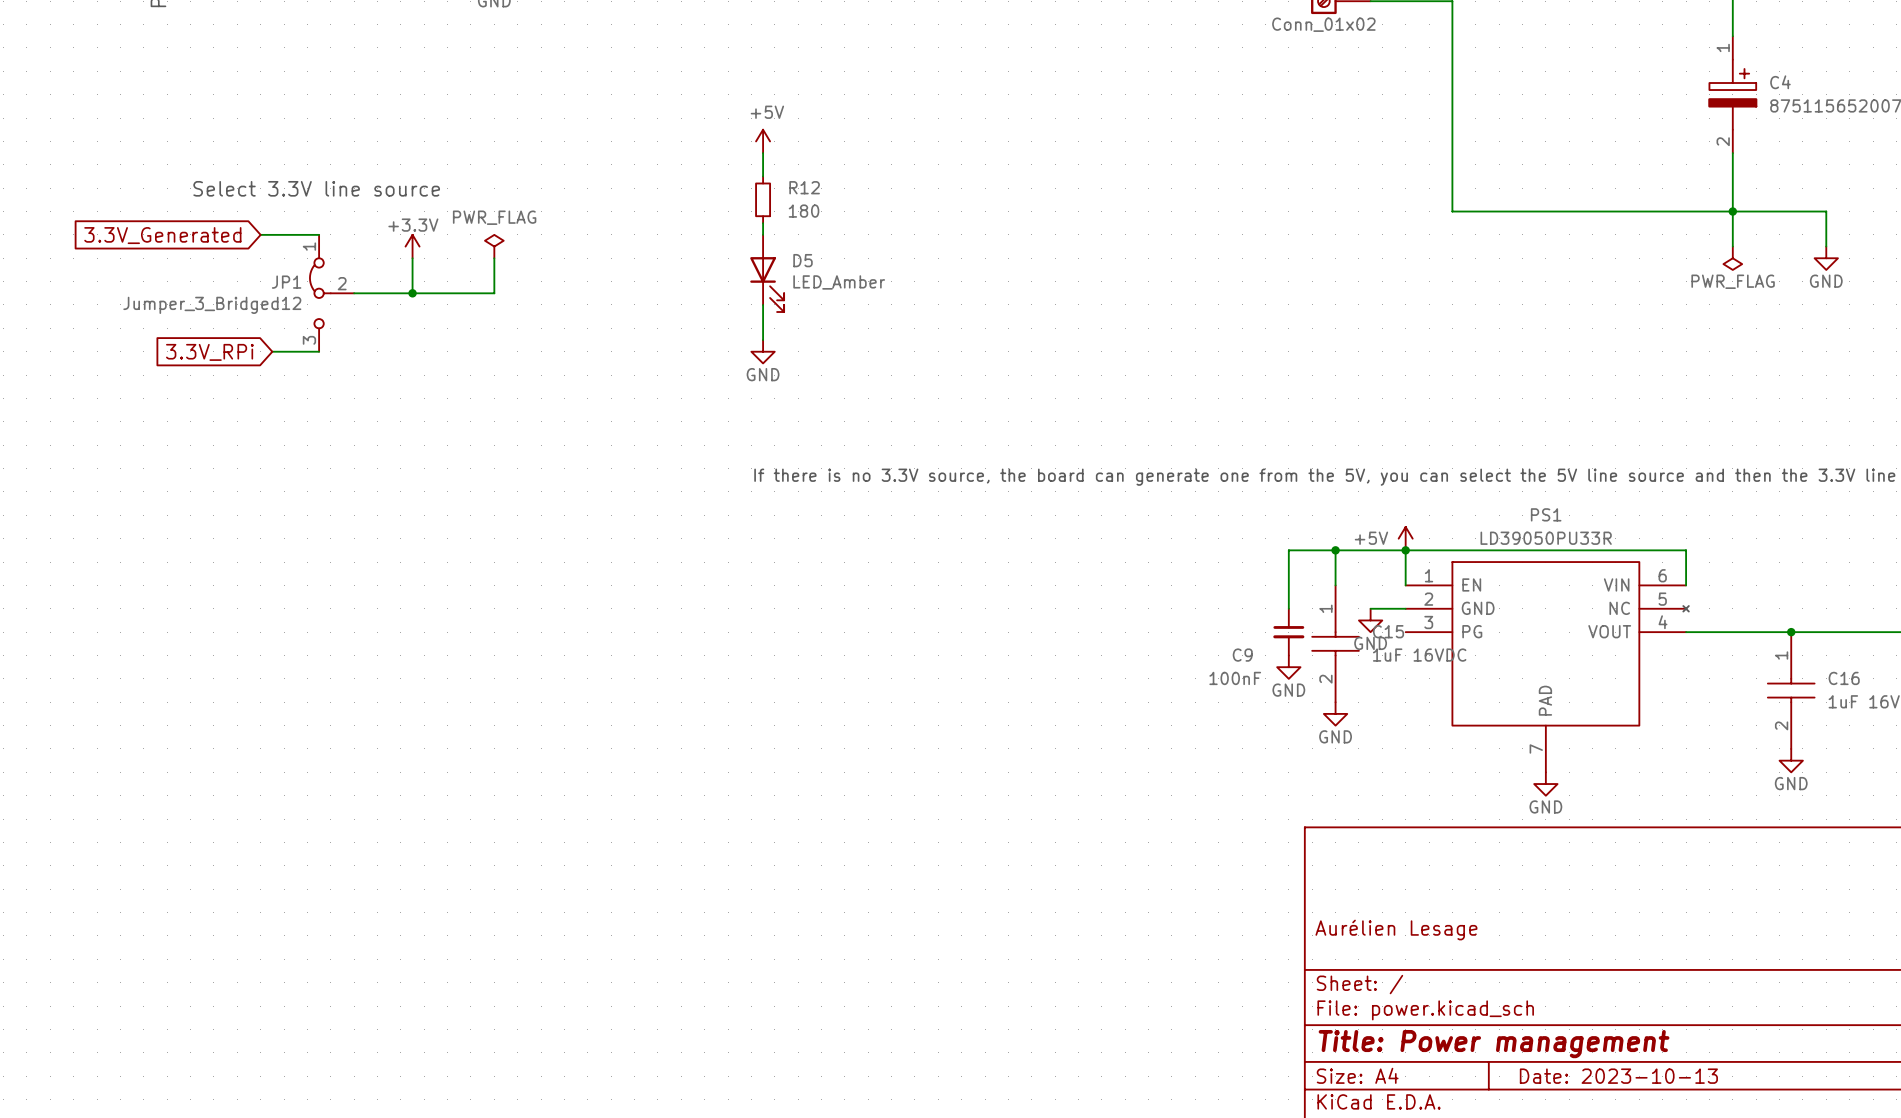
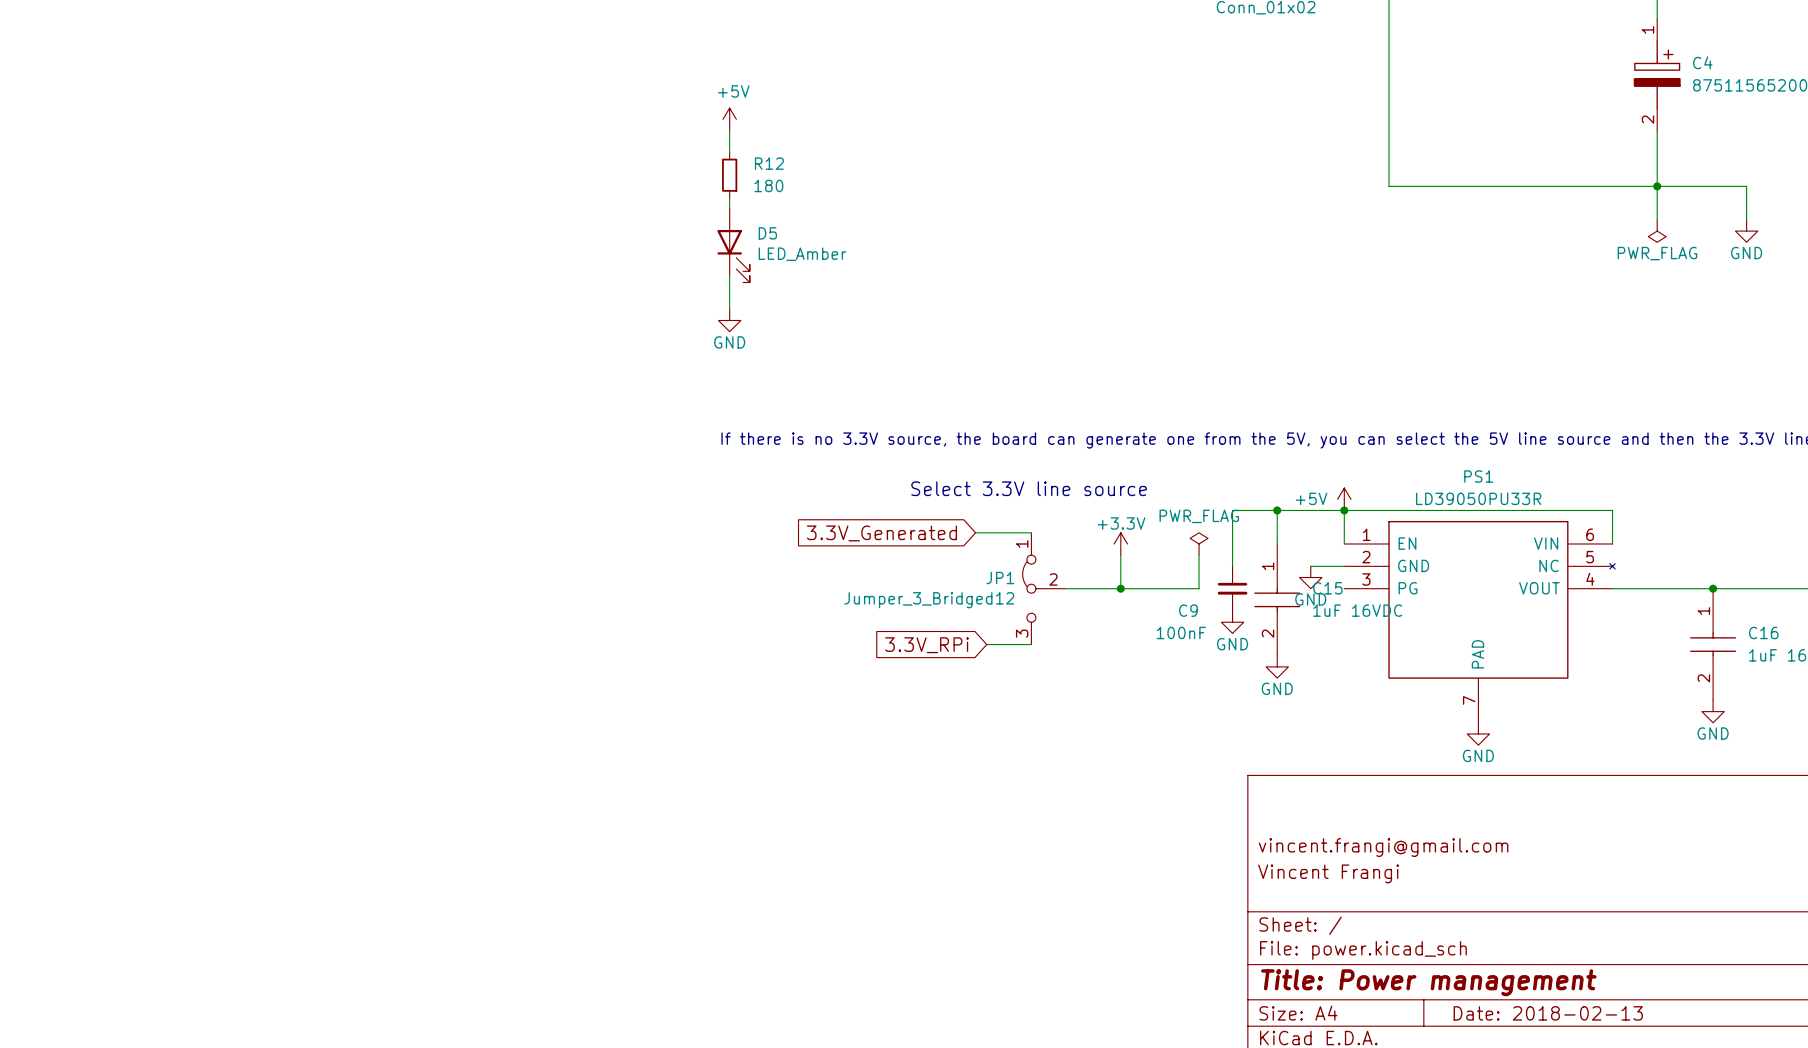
text: Select 3.3V line source (316, 188) -> none
wire: (260, 234) (319, 234) -> none
global label: 3.3V_Generated (162, 235) -> none
power symbol: +3.3V (412, 246) -> none
power symbol: PWR_FLAG (494, 246) -> none
wire: (412, 258) (412, 293) -> none
wire: (494, 258) (494, 293) (354, 293) -> none
JP1 position: (332, 293) -> (1043, 588)
junction: (412, 293) -> none
wire: (272, 351) (319, 351) -> none
global label: 3.3V_RPi (209, 352) -> none
text: none -> Select 3.3V line source (1029, 488)
wire: none -> (975, 532) (1031, 532)
global label: none -> 3.3V_Generated (881, 533)
power symbol: none -> +3.3V (1120, 543)
power symbol: none -> PWR_FLAG (1199, 543)
wire: none -> (1120, 555) (1120, 588)
wire: none -> (1199, 555) (1199, 588) (1064, 588)
junction: none -> (1120, 588)
wire: none -> (986, 644) (1031, 644)
global label: none -> 3.3V_RPi (926, 645)
title block: none -> vincent.frangi@gmail.com (1383, 847)
title block: Aurélien Lesage (1396, 930) -> Vincent Frangi (1328, 873)
title block: Date: 2023-10-13 (1618, 1076) -> Date: 2018-02-13 (1548, 1013)

